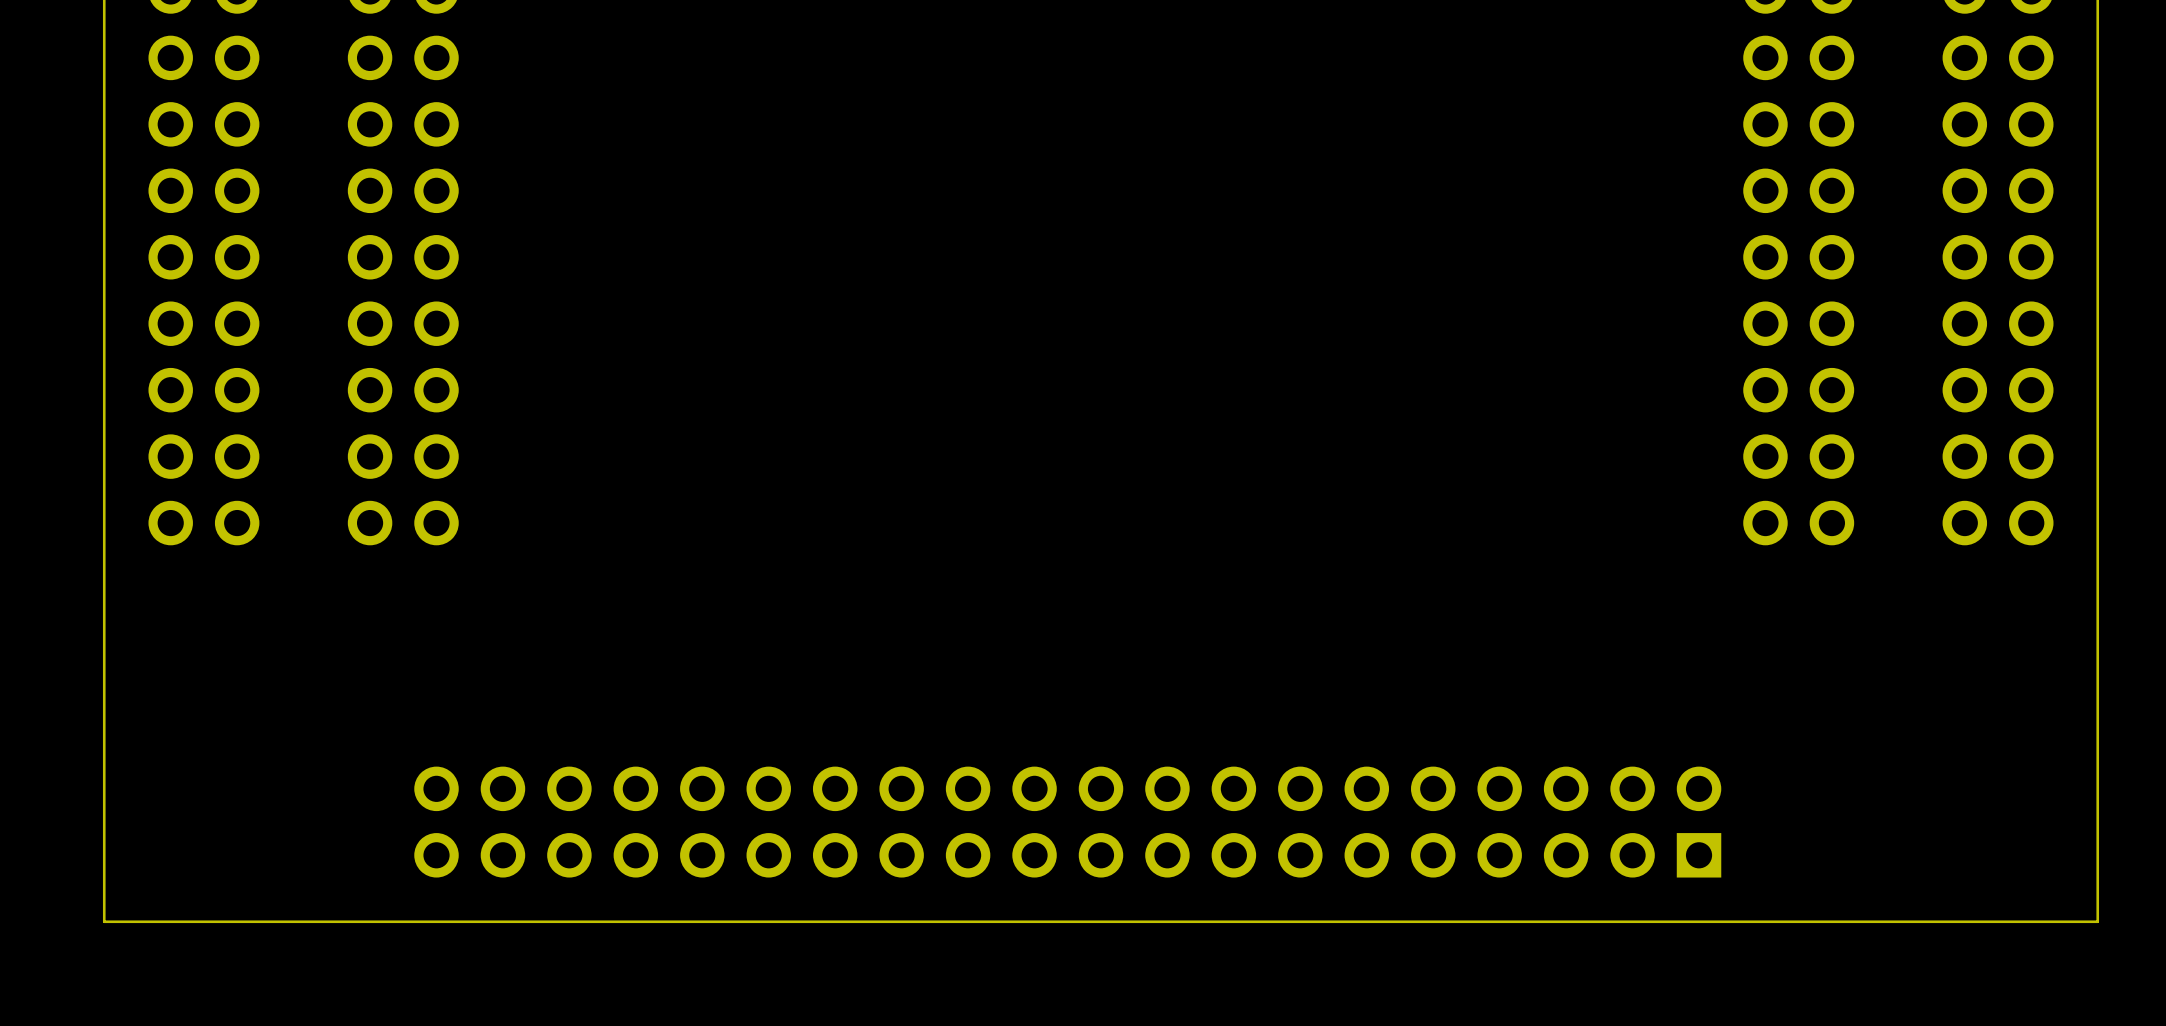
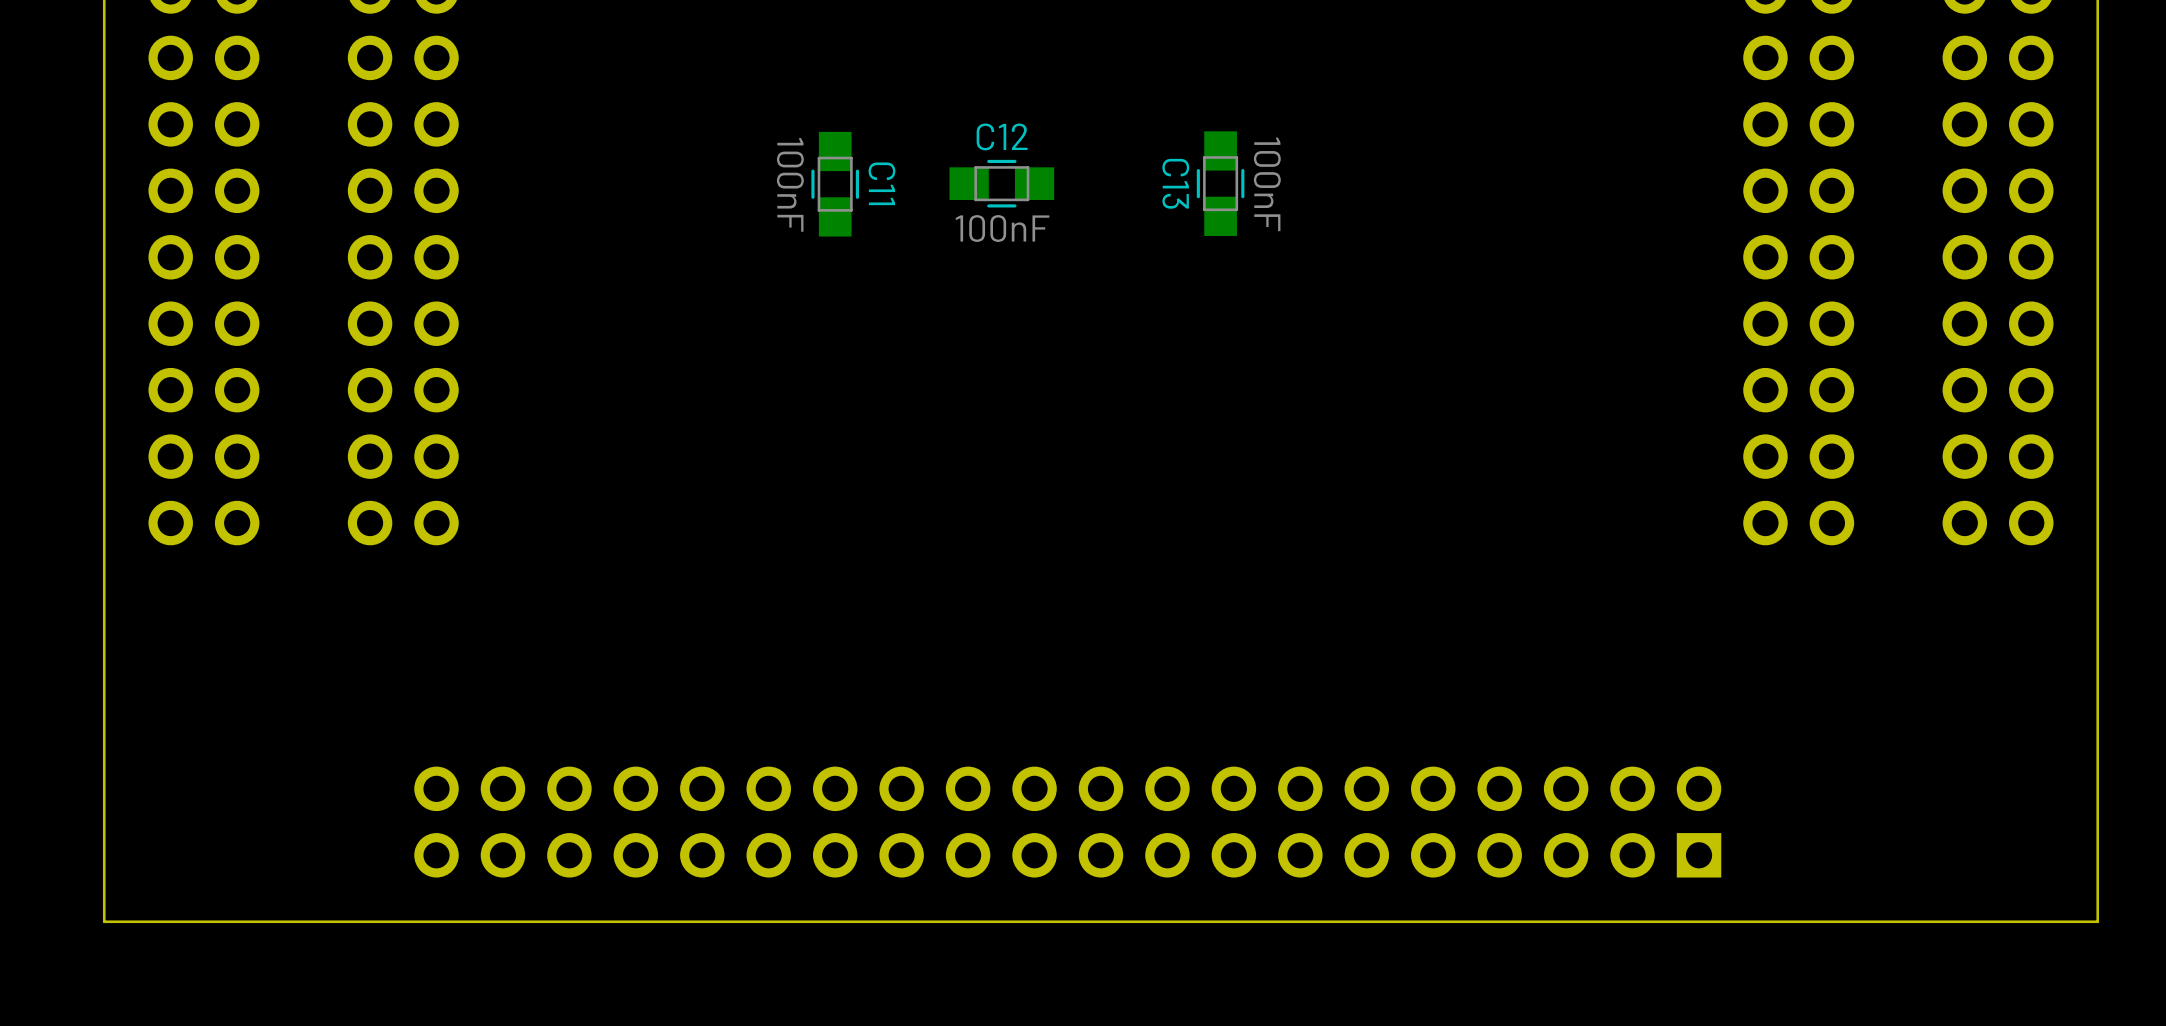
C12: none -> 100nF (1001, 183)
C13: none -> 100nF (1220, 183)
C11: none -> 100nF (835, 184)

